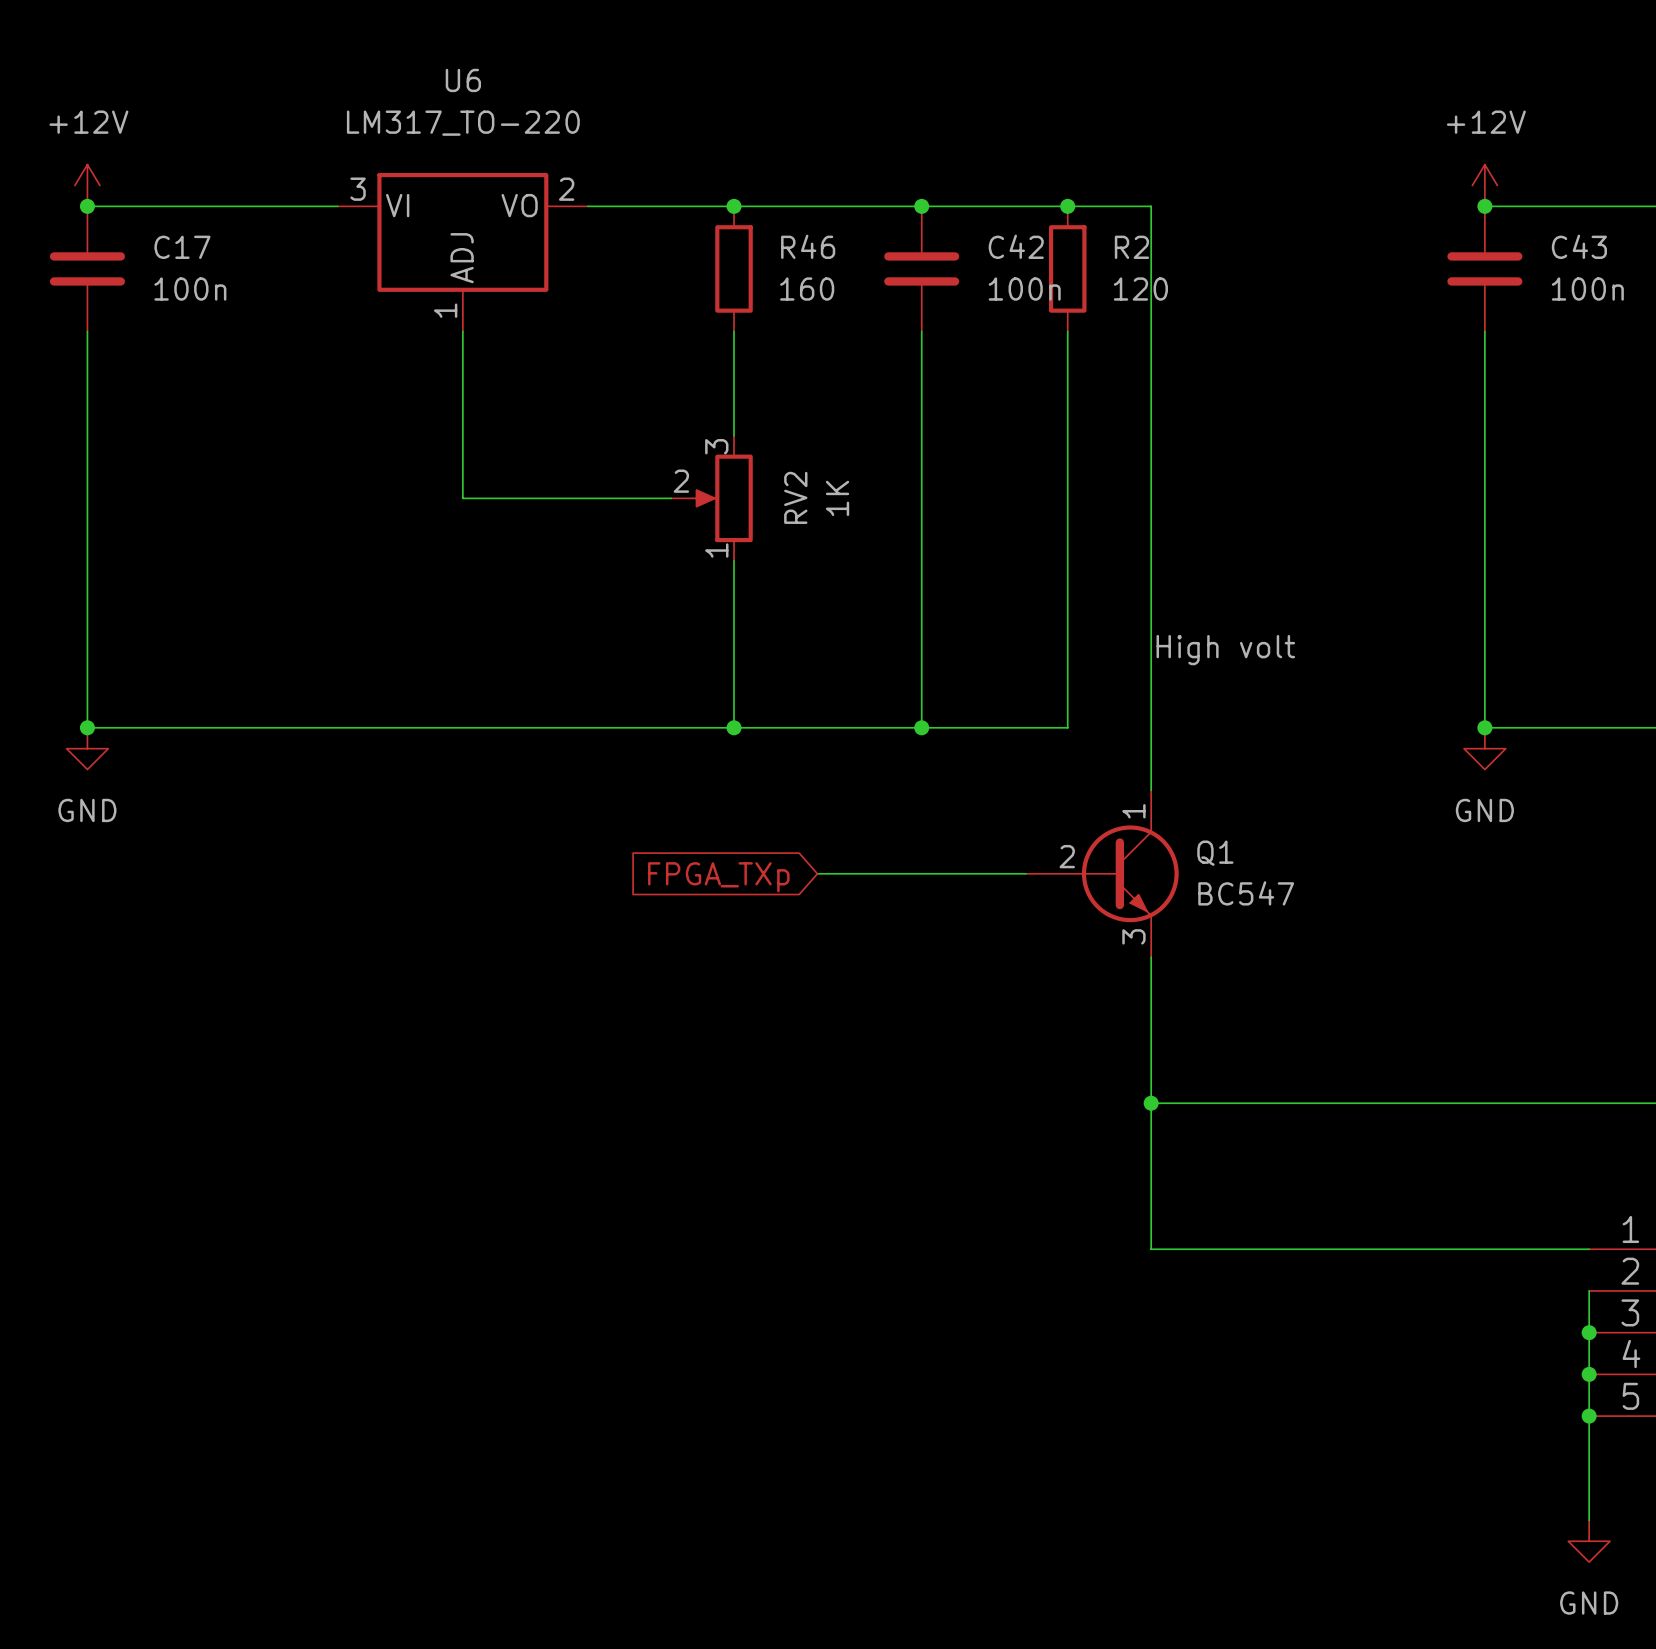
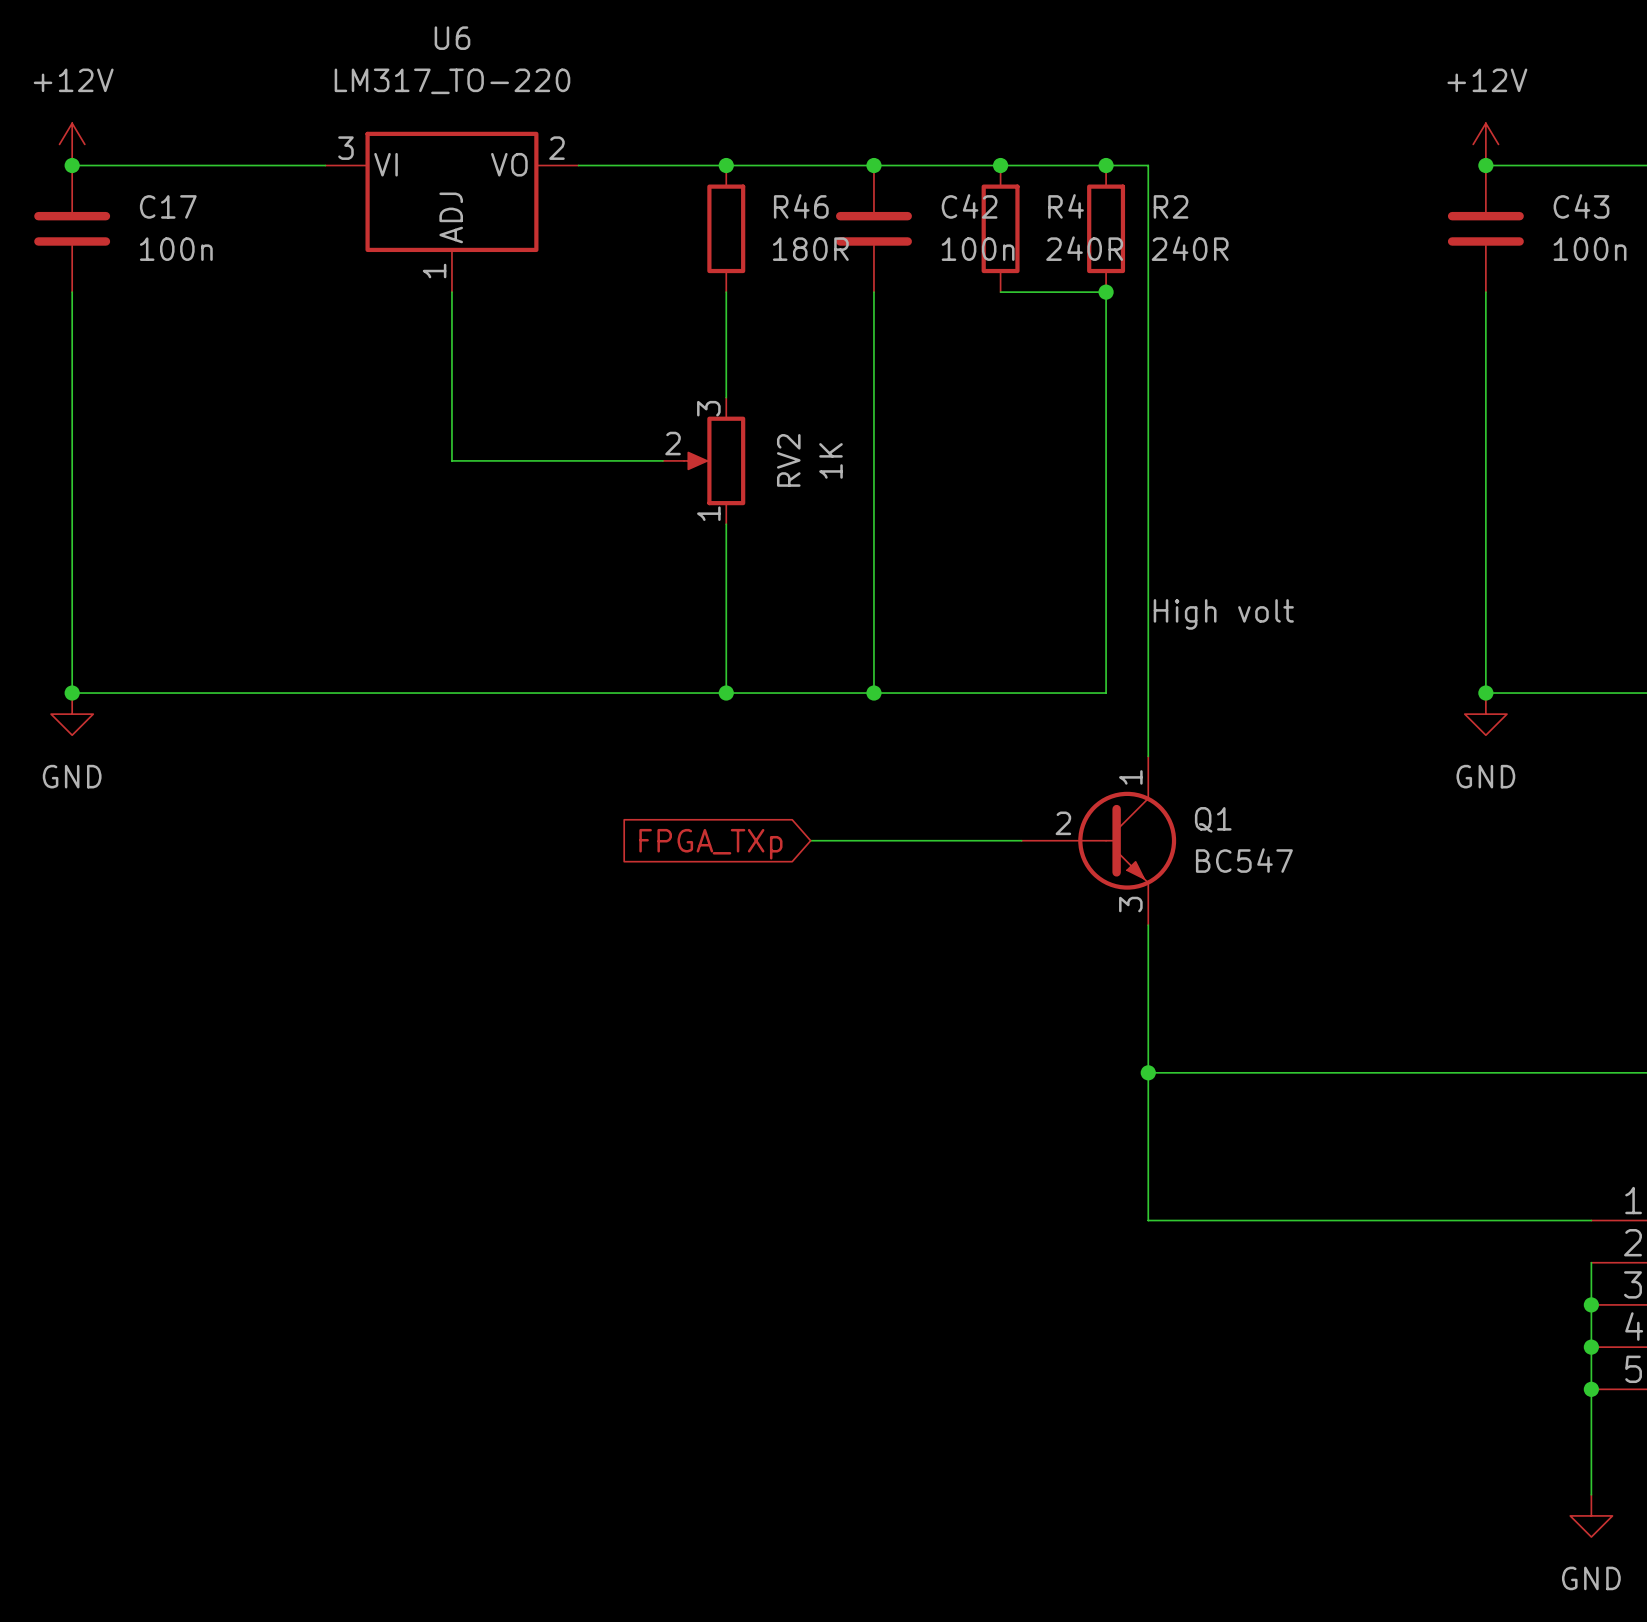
junction: none -> (873, 165)
junction: (921, 206) -> none
junction: none -> (1000, 165)
junction: (1067, 206) -> none
junction: none -> (1106, 165)
C42 position: (921, 268) -> (873, 228)
R4: none -> 240R (1000, 228)
R2 position: (1067, 268) -> (1106, 228)
R46 value: 160 (807, 289) -> 180R (810, 249)
R2 value: 120 (1140, 289) -> 240R (1190, 248)
wire: (921, 331) (921, 727) -> (873, 292) (873, 693)
wire: (1067, 331) (1067, 727) -> (1000, 292) (1106, 292) (1106, 693) (1063, 693)
junction: none -> (1106, 292)
junction position: (921, 727) -> (873, 693)

